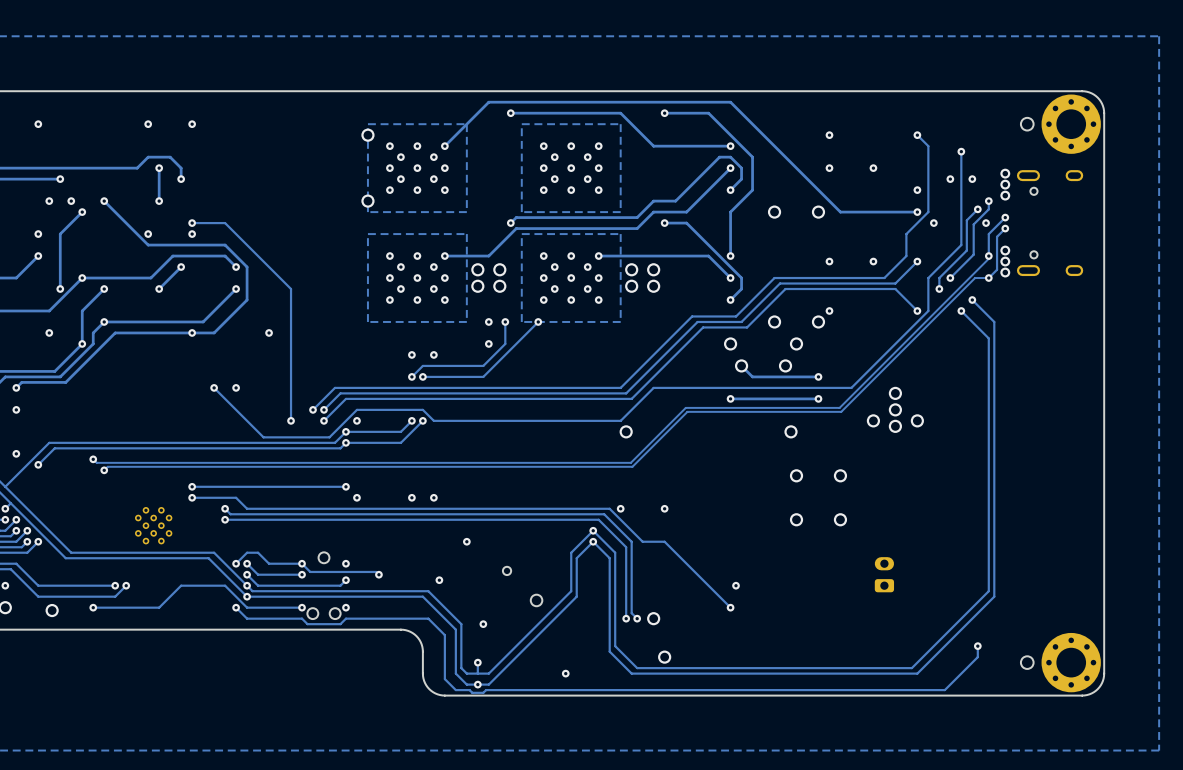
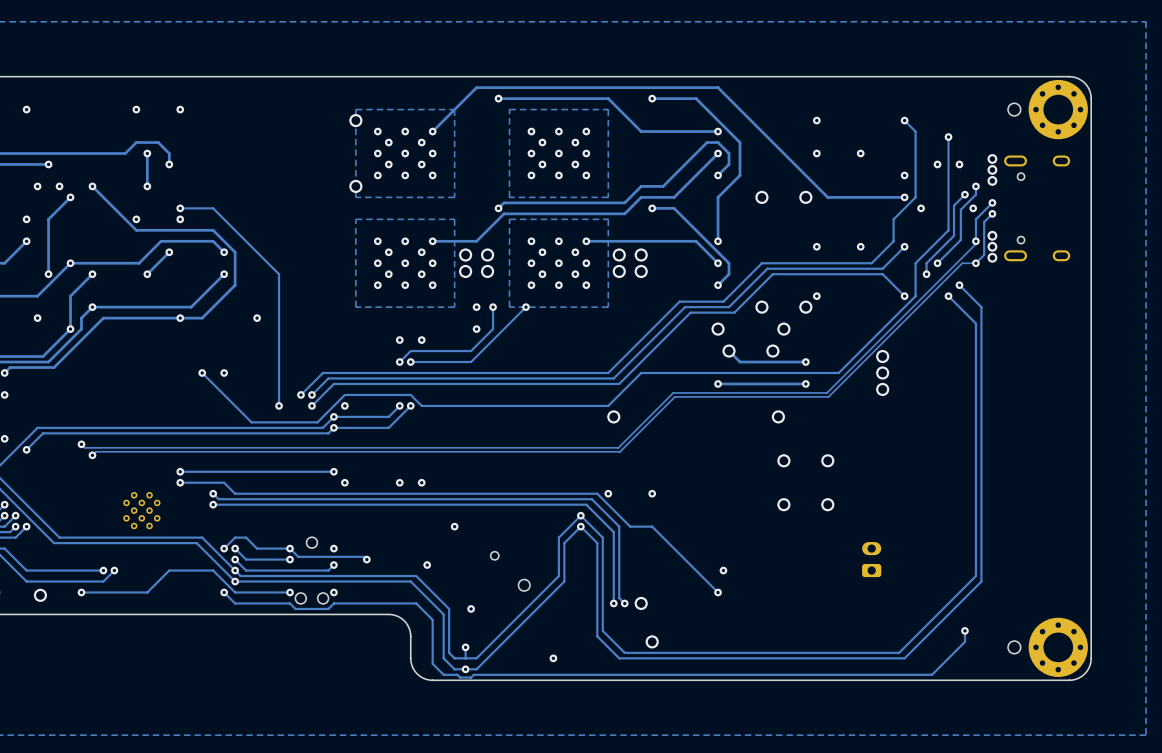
via: none -> (882, 356)
via: none -> (882, 372)
via: (895, 393) -> none
via: none -> (882, 389)
via: (895, 409) -> none
via: (873, 420) -> none
via: (917, 420) -> none
via: (895, 426) -> none

